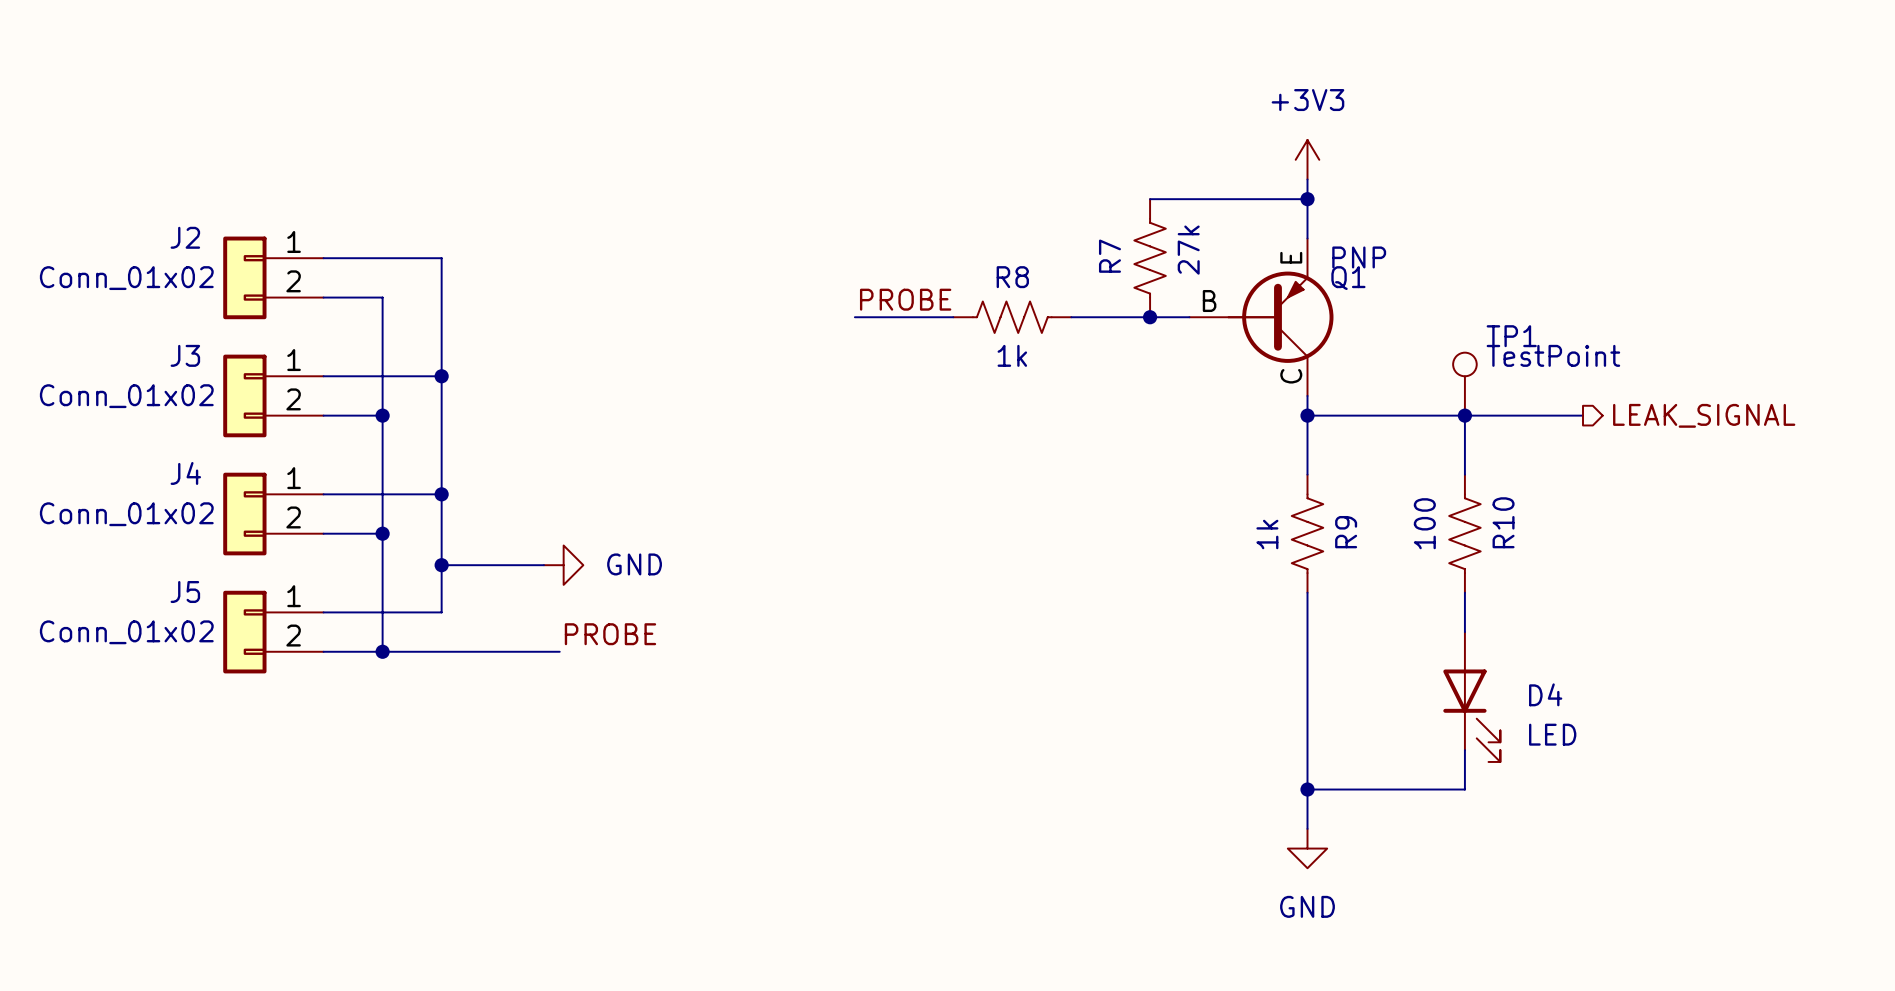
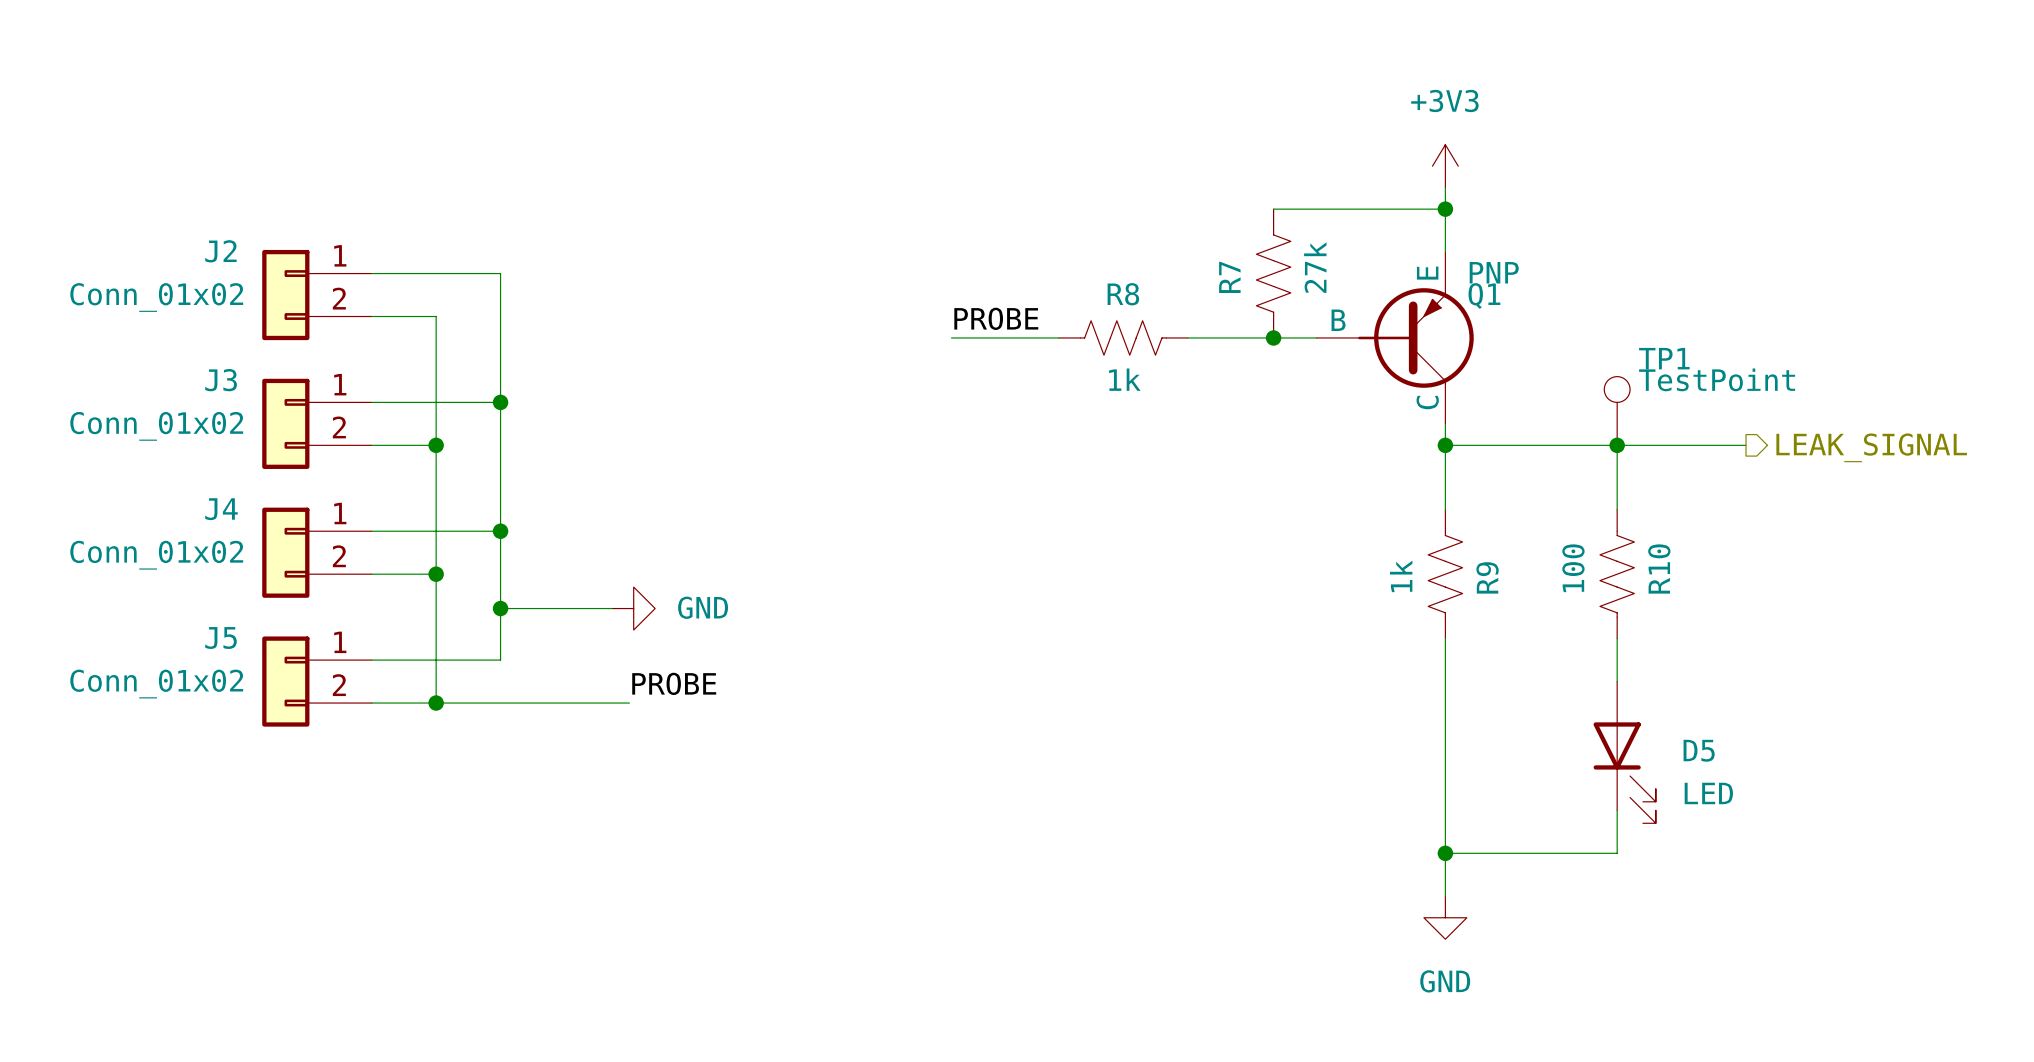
D4 name: D4 (1545, 694) -> D5 (1699, 750)

